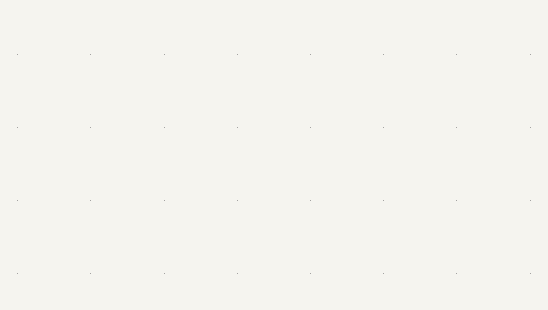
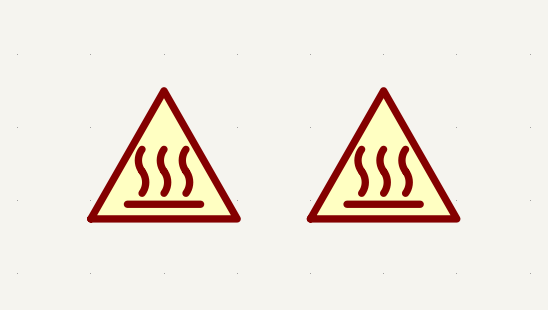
part: none -> (164, 154)
part: none -> (383, 154)

